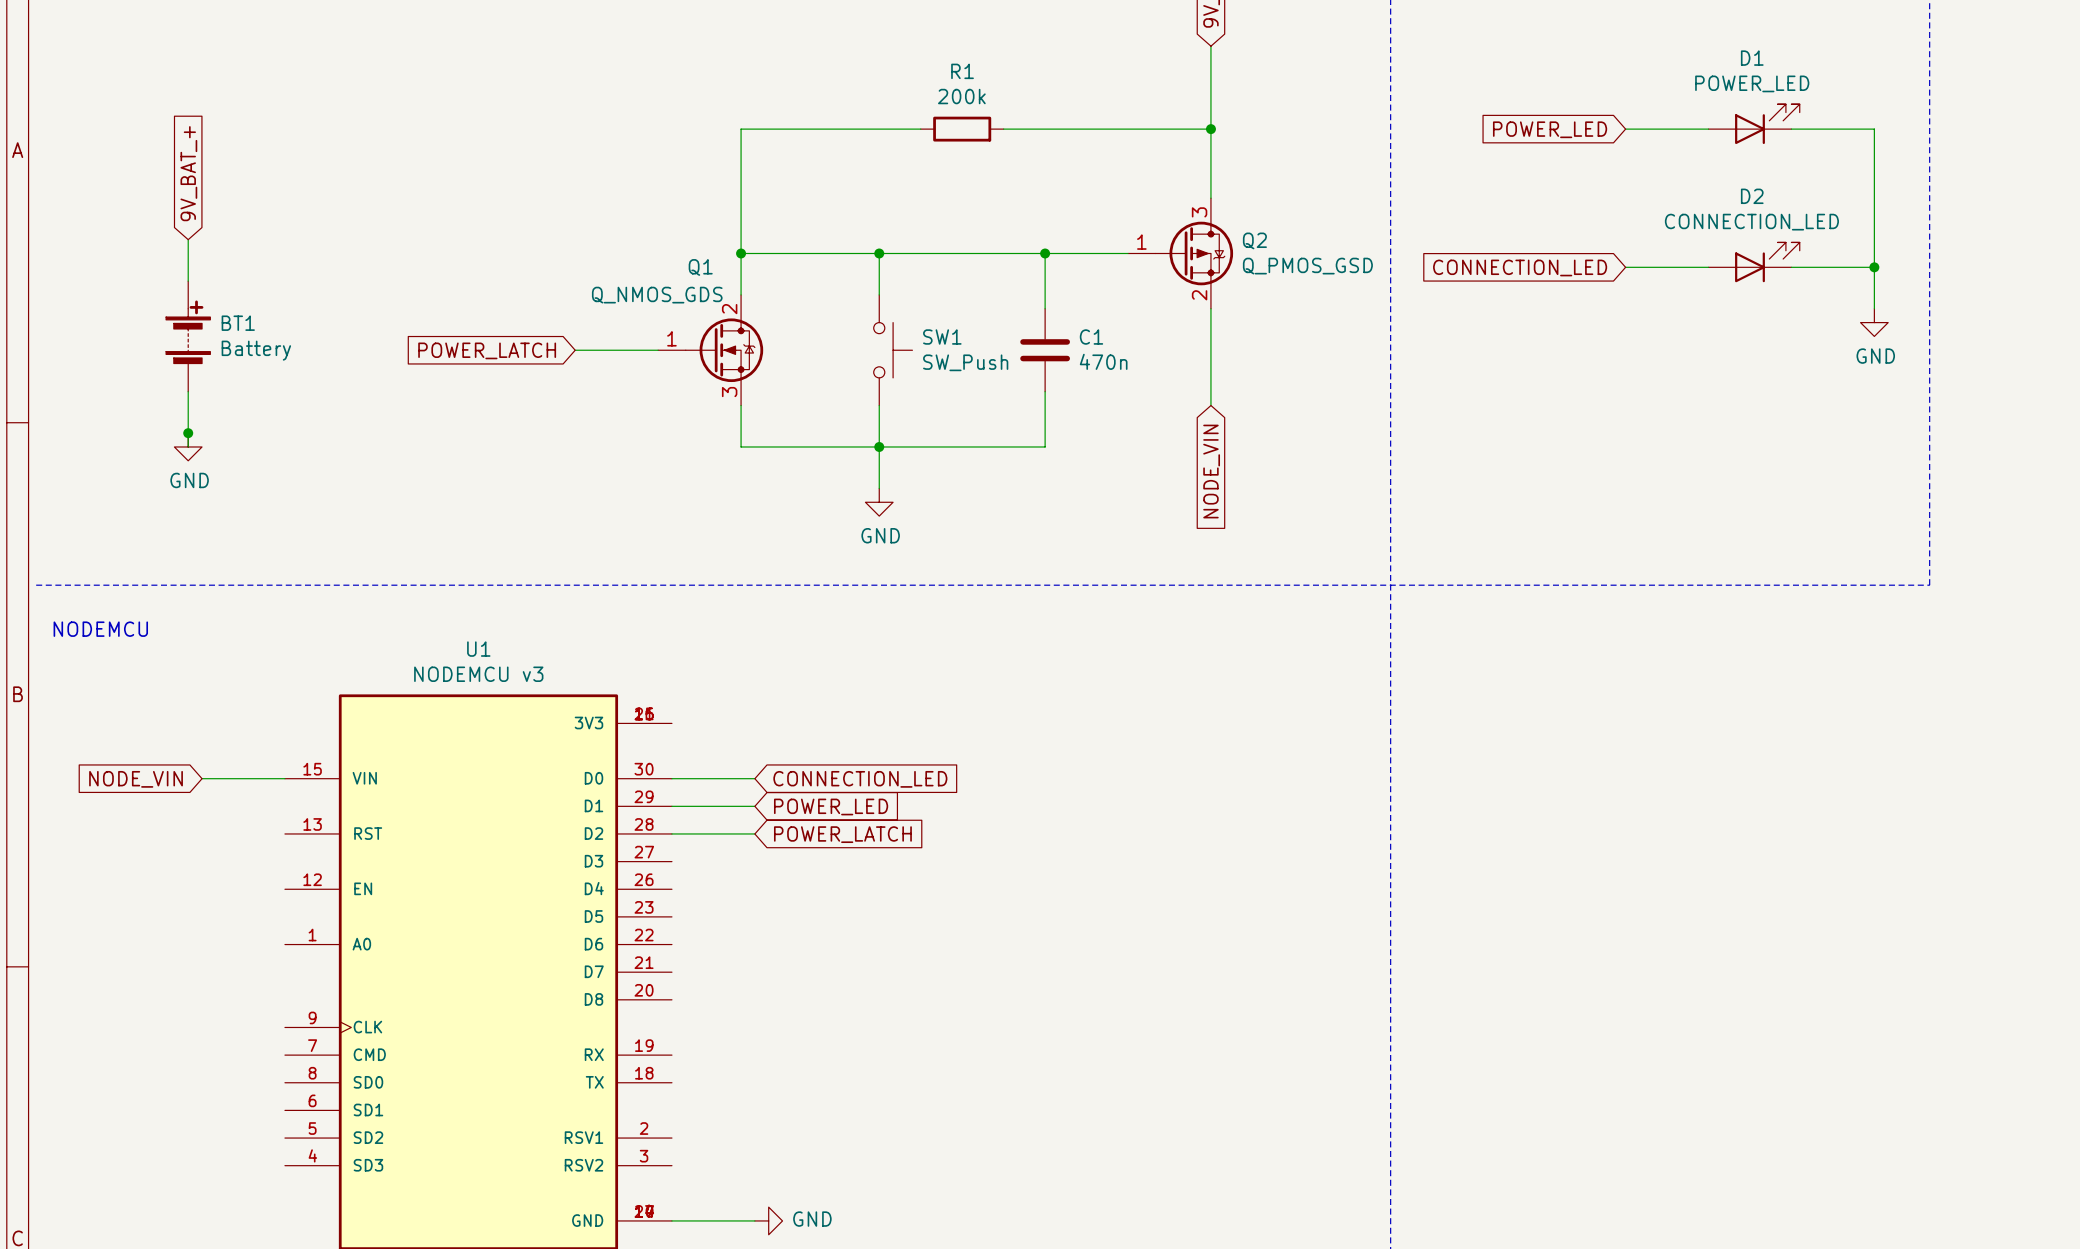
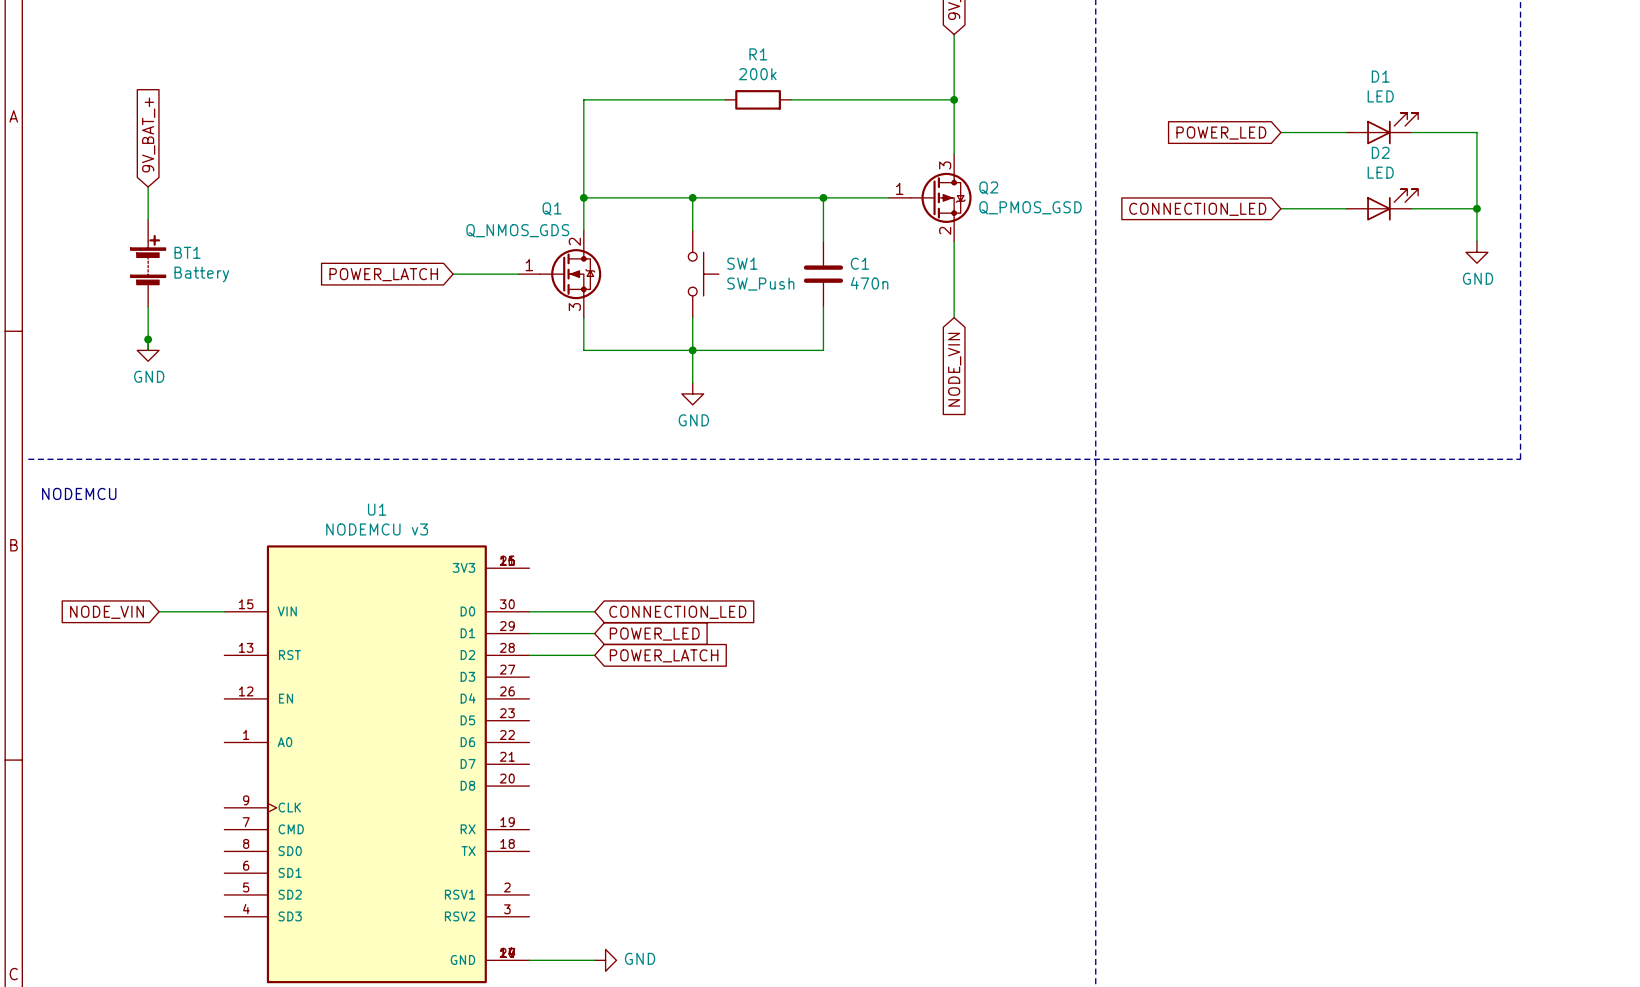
D1 value: POWER_LED (1752, 83) -> LED (1380, 96)
D1 position: (1754, 124) -> (1382, 128)
global label position: POWER_LED (1550, 129) -> POWER_LED (1221, 133)
wire: (1625, 129) (1708, 129) -> (1280, 132) (1346, 132)
wire: (1791, 129) (1874, 129) (1874, 170) -> (1411, 132) (1476, 132)
D2 value: CONNECTION_LED (1751, 222) -> LED (1380, 172)

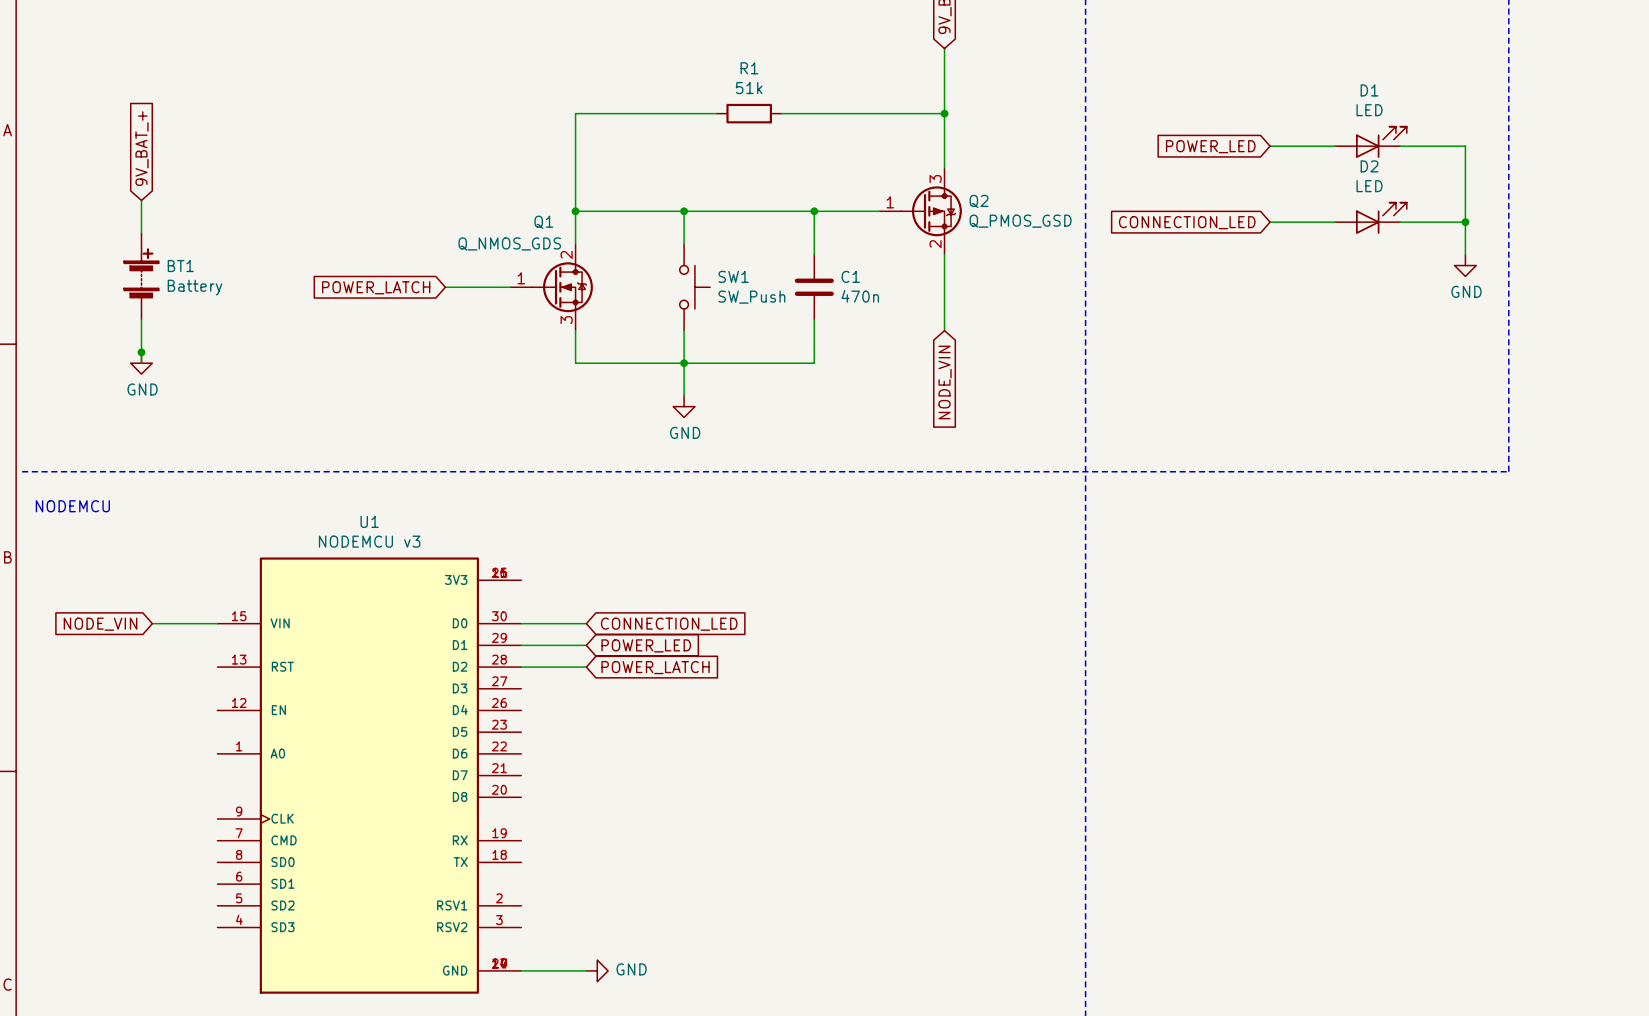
R1 value: 200k (757, 74) -> 51k (749, 88)

